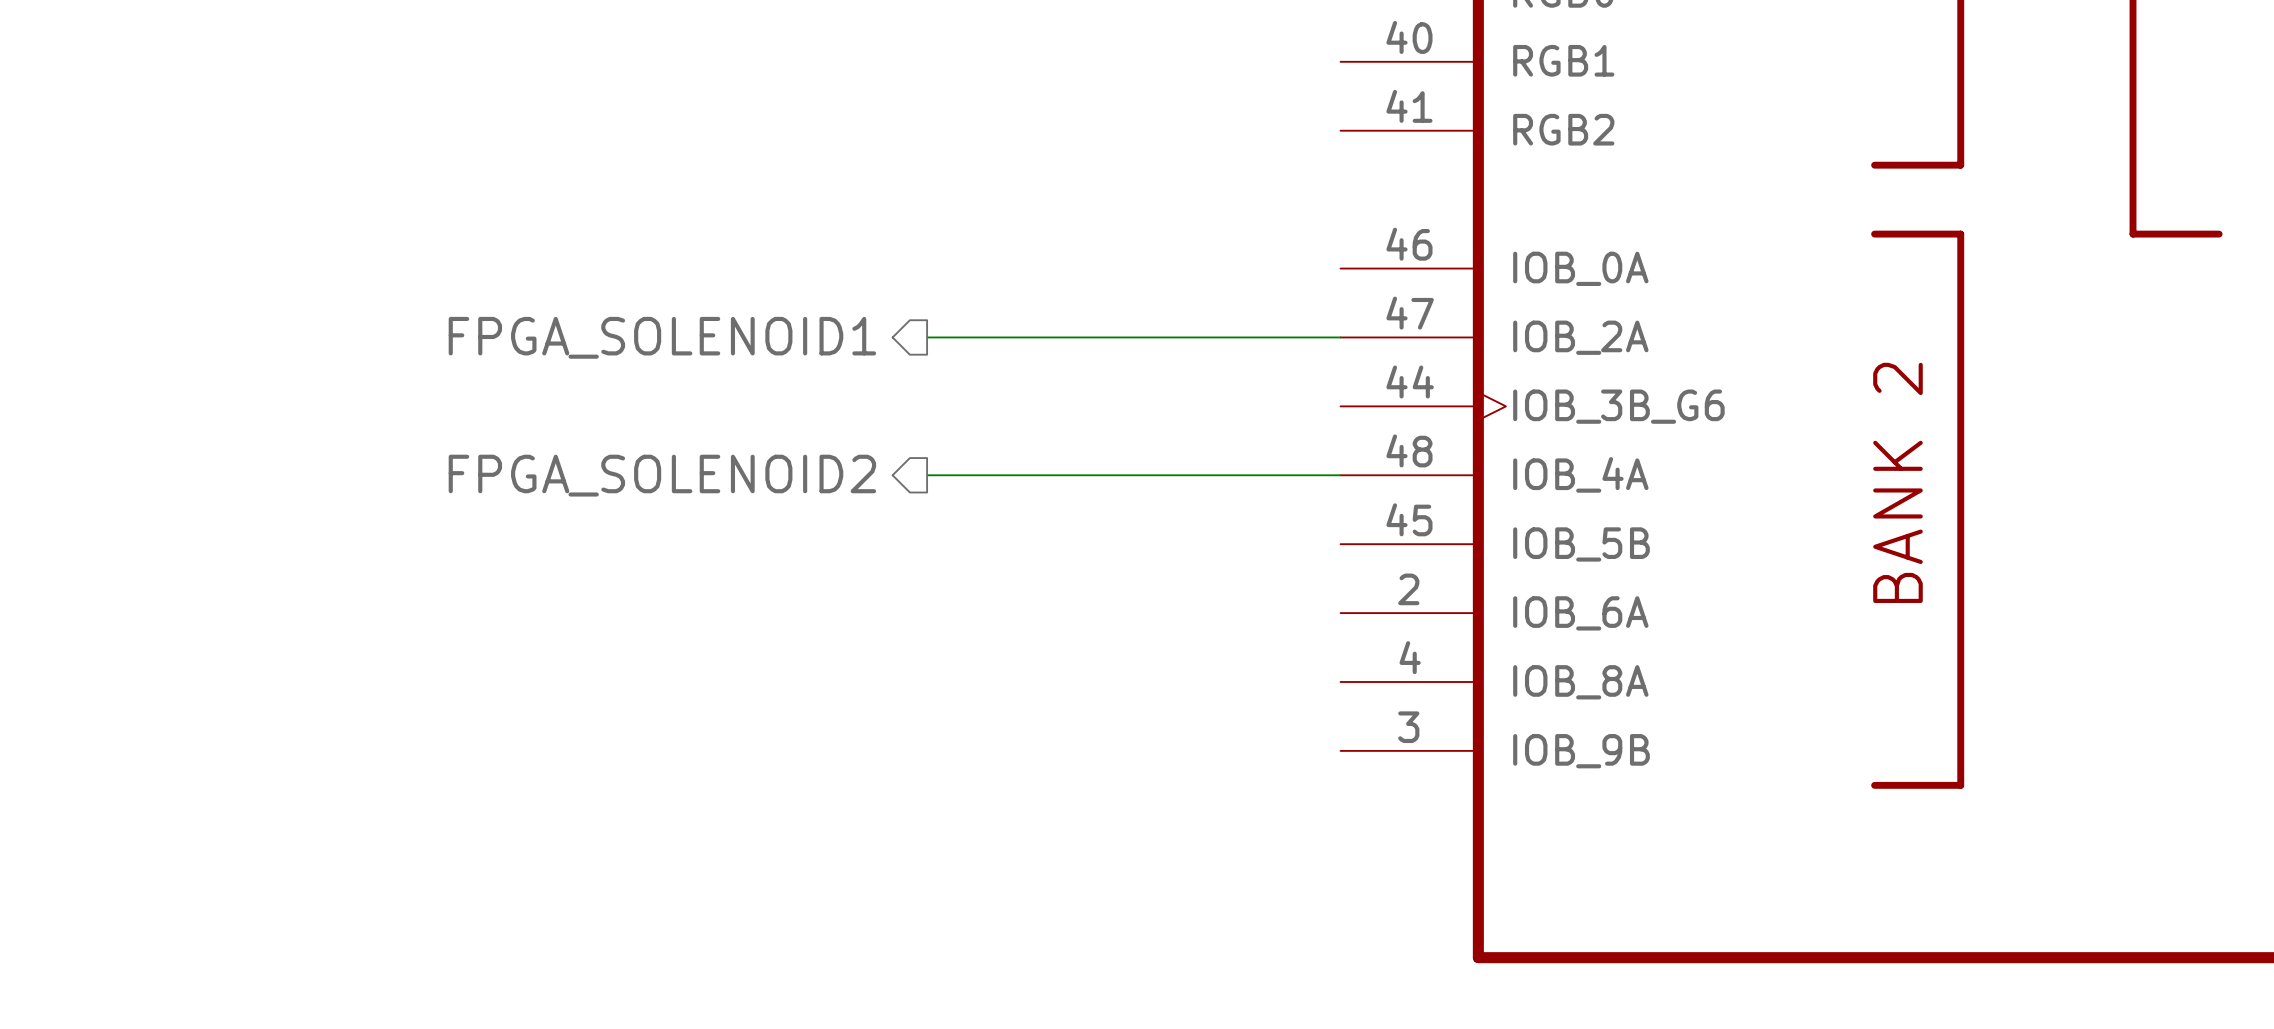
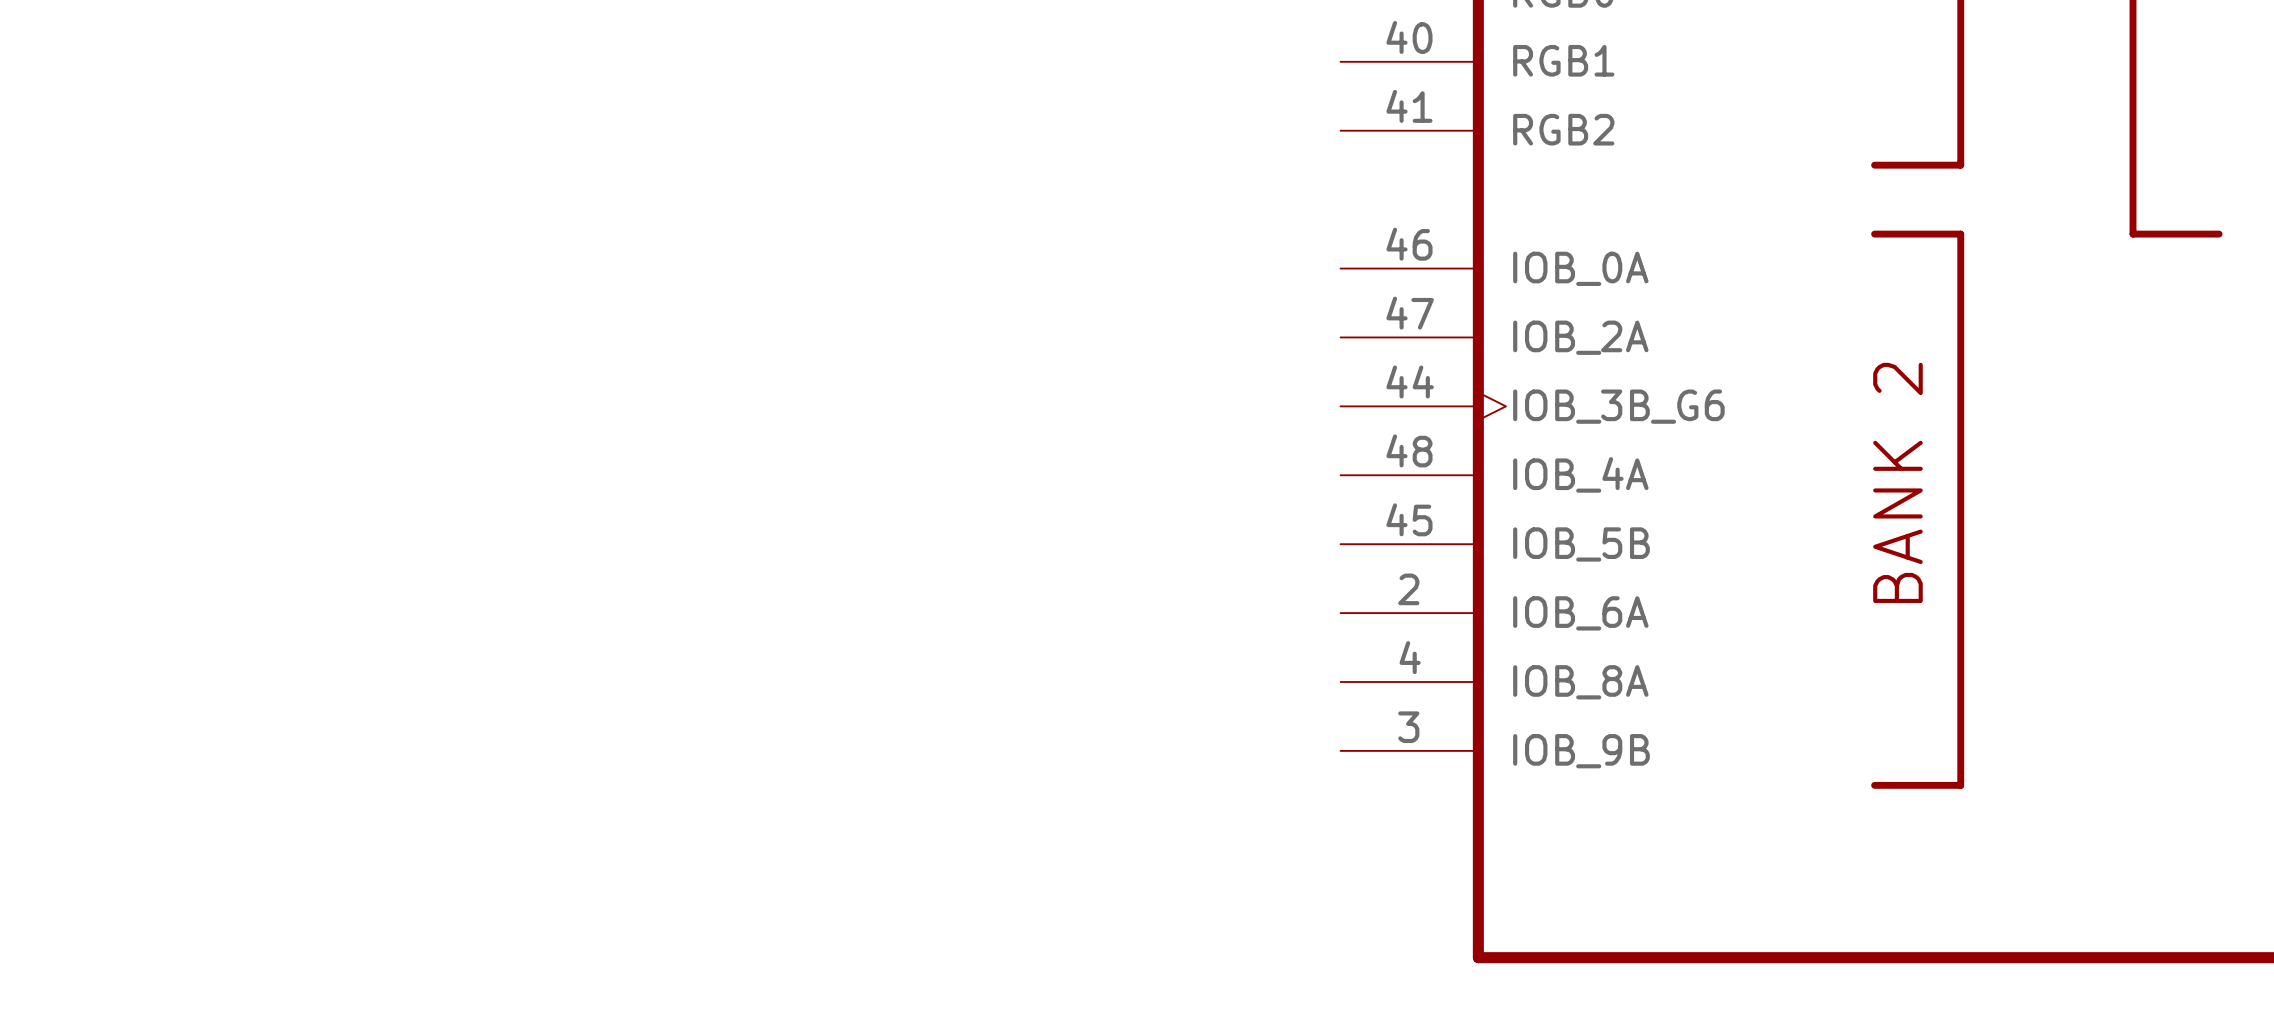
hierarchical label: FPGA_SOLENOID1 (662, 337) -> none
wire: (927, 337) (1340, 337) -> none
hierarchical label: FPGA_SOLENOID2 (662, 475) -> none
wire: (927, 475) (1340, 475) -> none

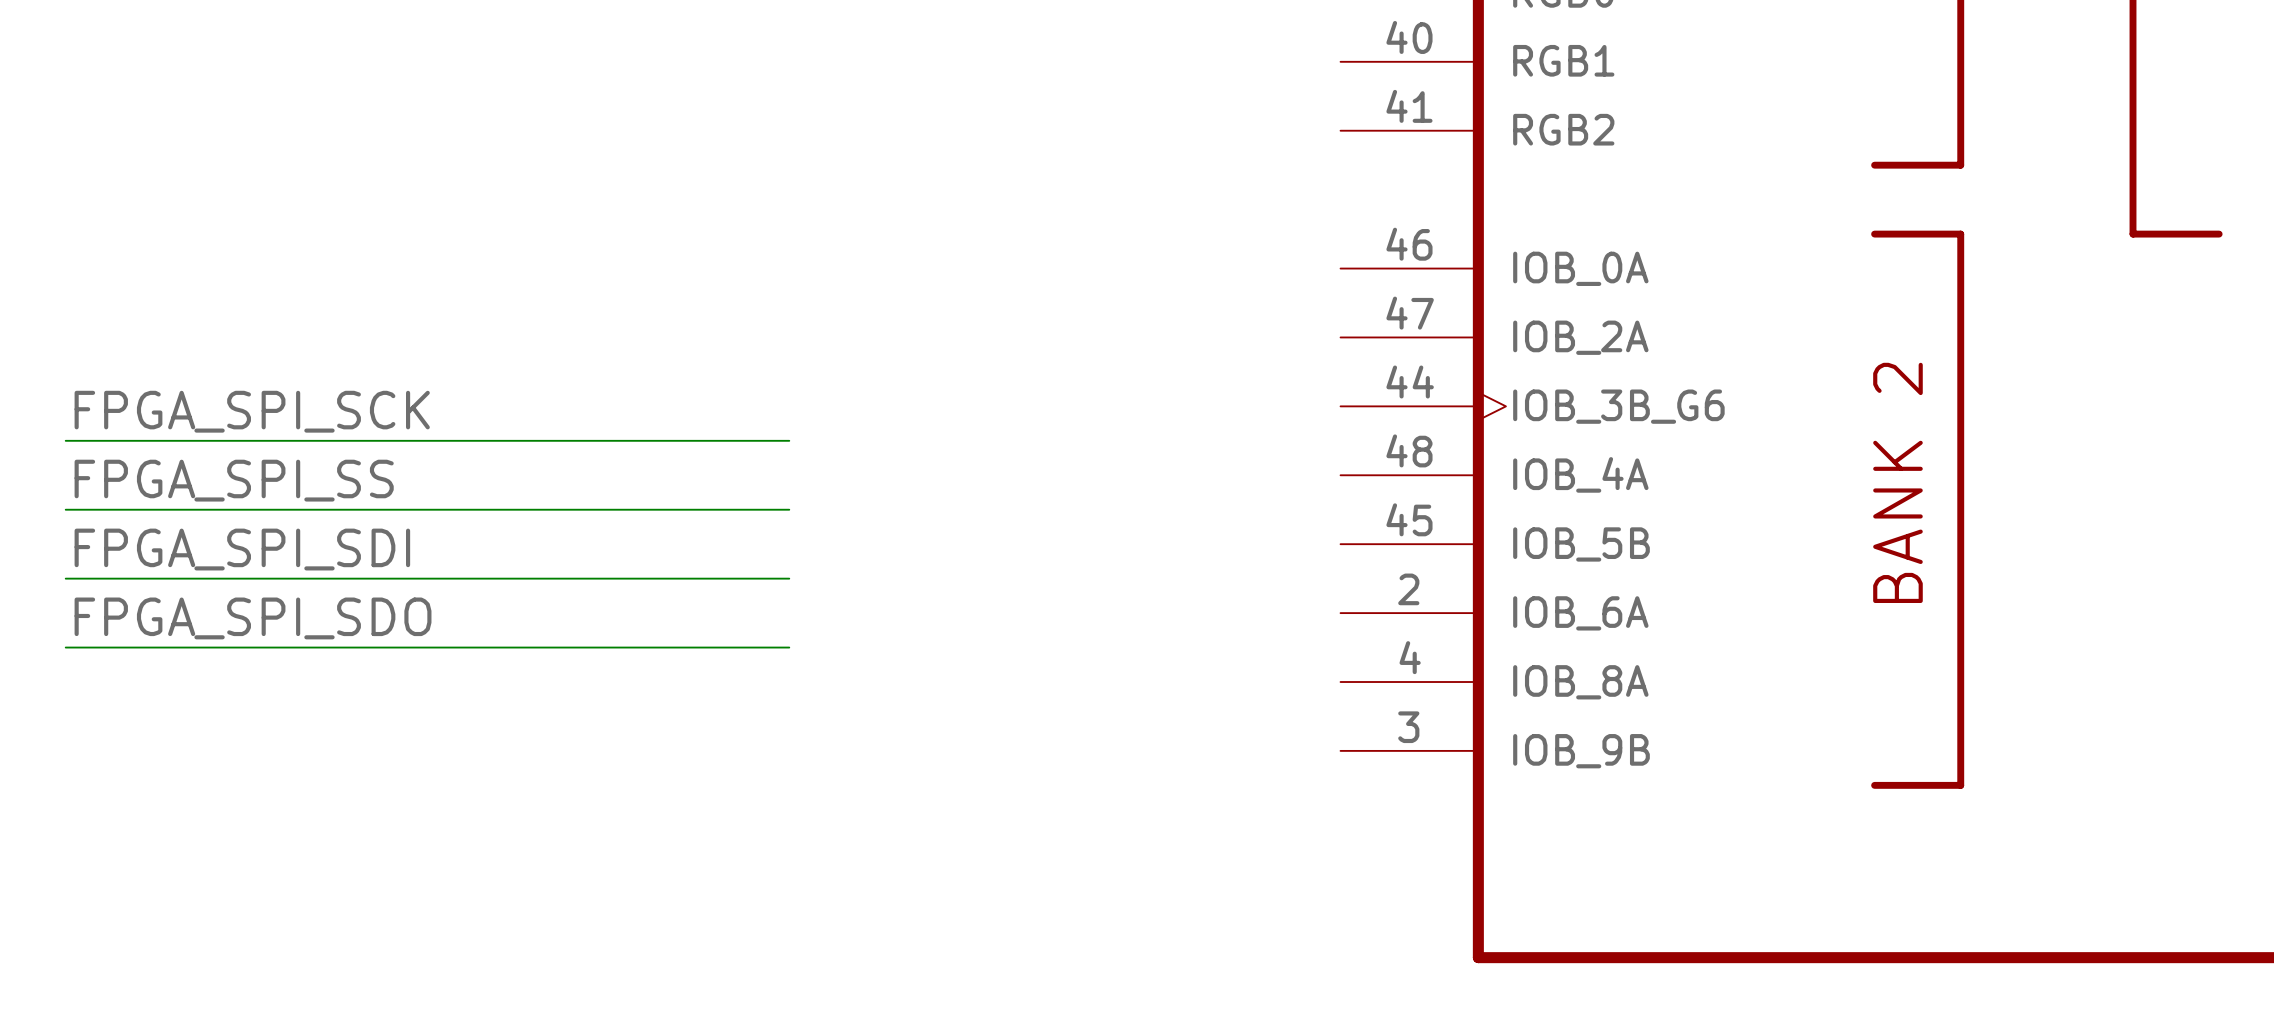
label: none -> FPGA_SPI_SCK (252, 411)
wire: none -> (65, 440) (789, 440)
label: none -> FPGA_SPI_SS (234, 480)
wire: none -> (65, 509) (789, 509)
label: none -> FPGA_SPI_SDI (242, 549)
wire: none -> (65, 578) (789, 578)
label: none -> FPGA_SPI_SDO (253, 618)
wire: none -> (65, 647) (789, 647)

